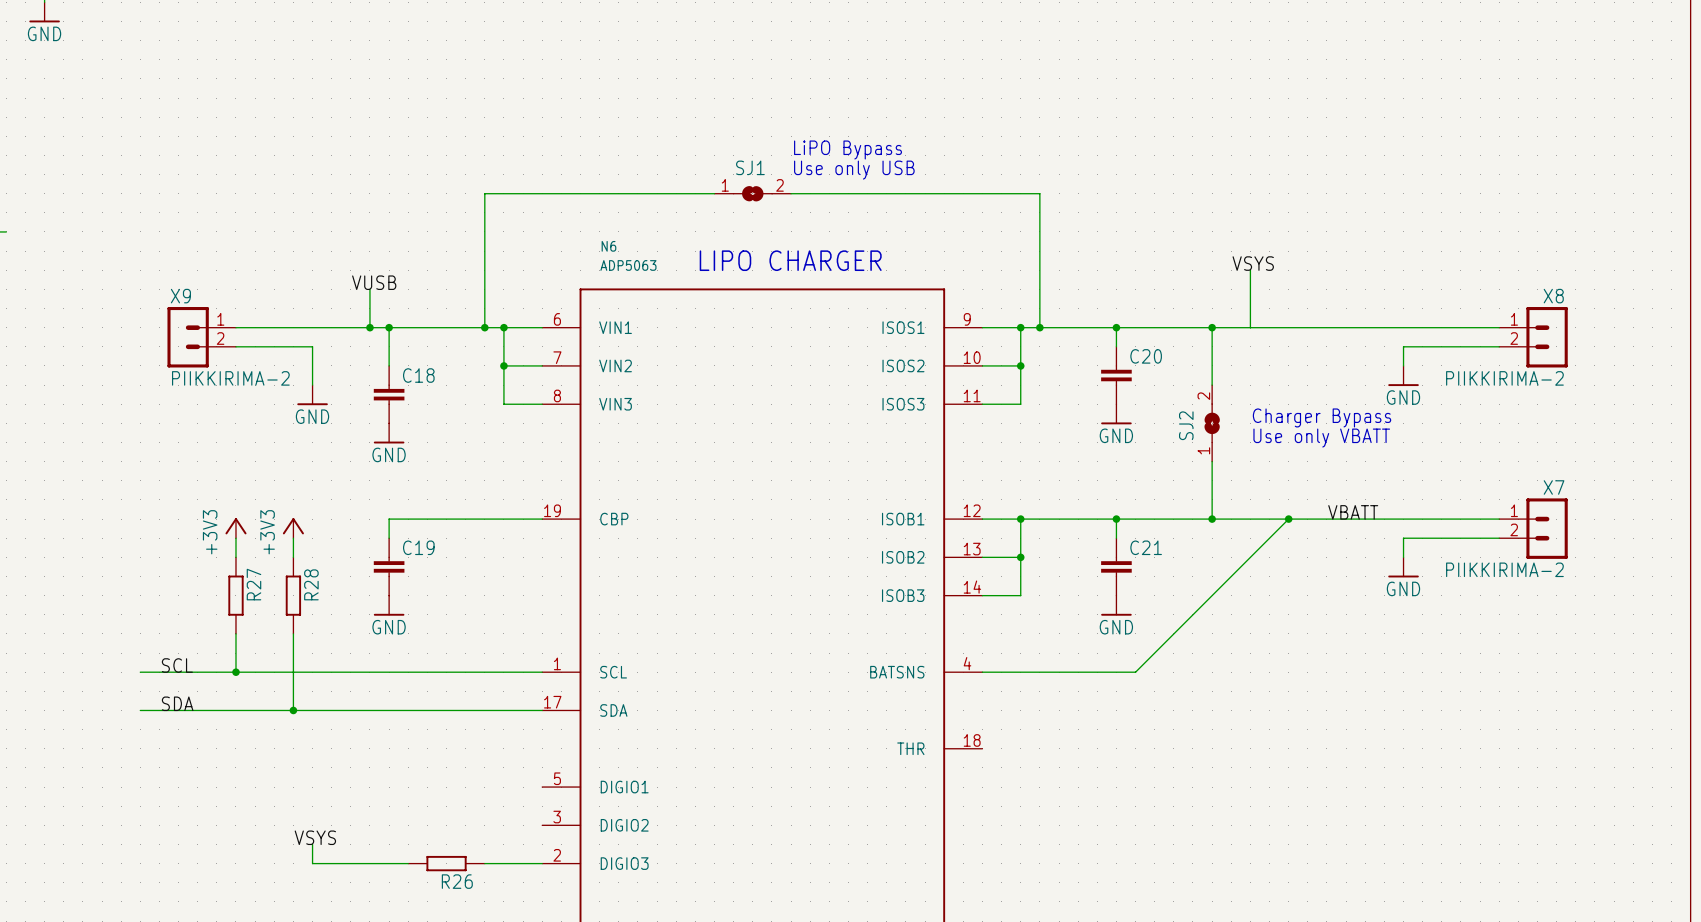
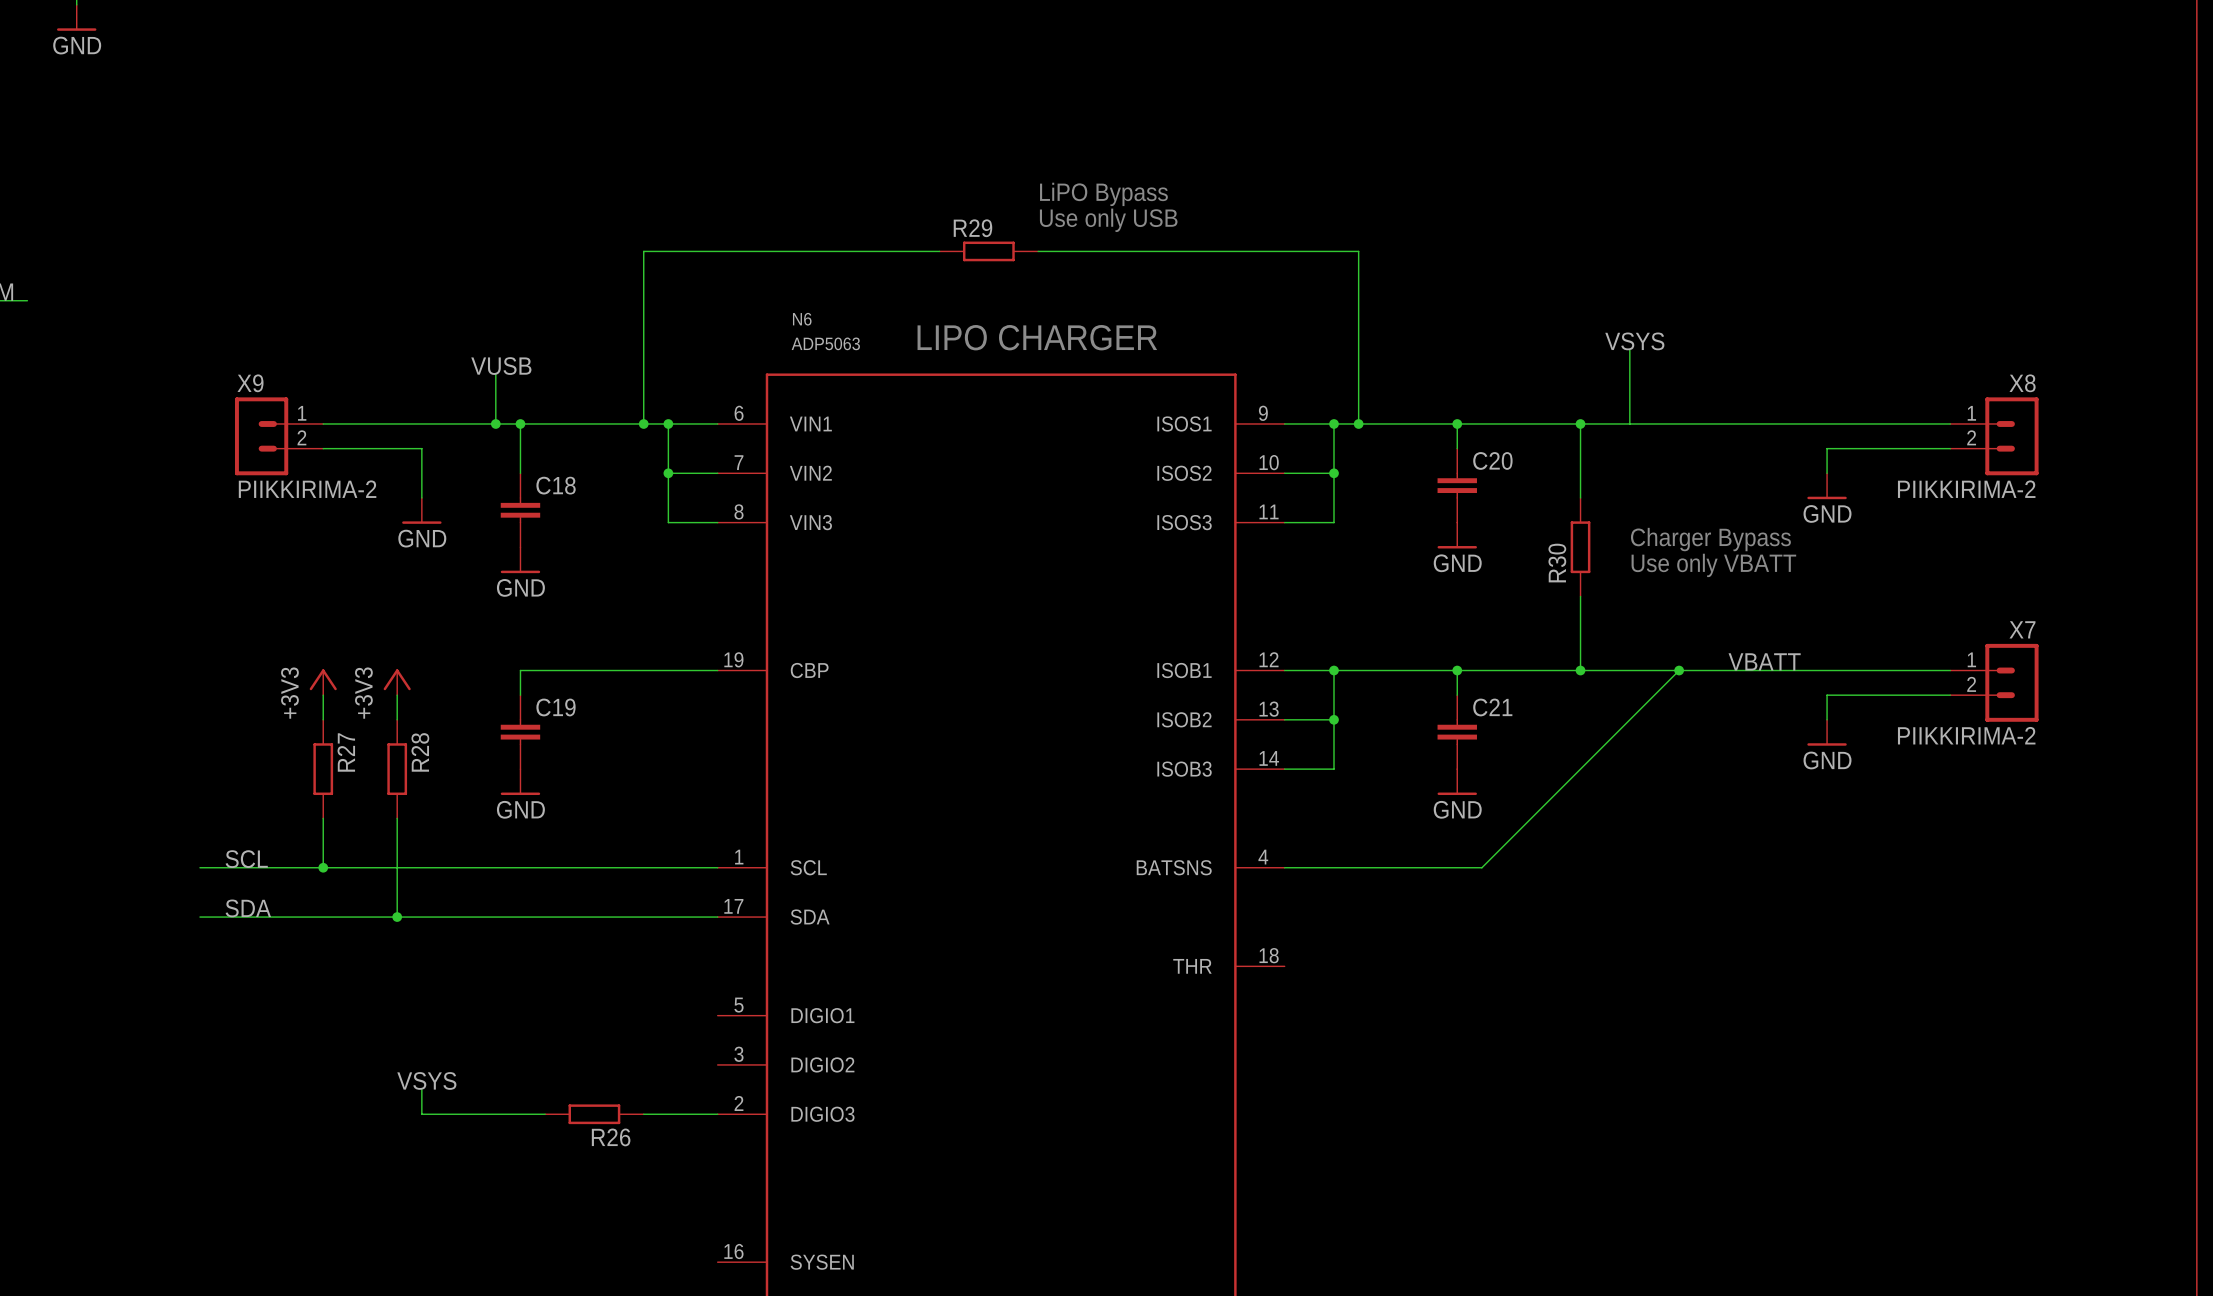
SJ1: (752, 193) -> none
R29: none -> (988, 251)
SJ2: (1212, 423) -> none
R30: none -> (1580, 547)

